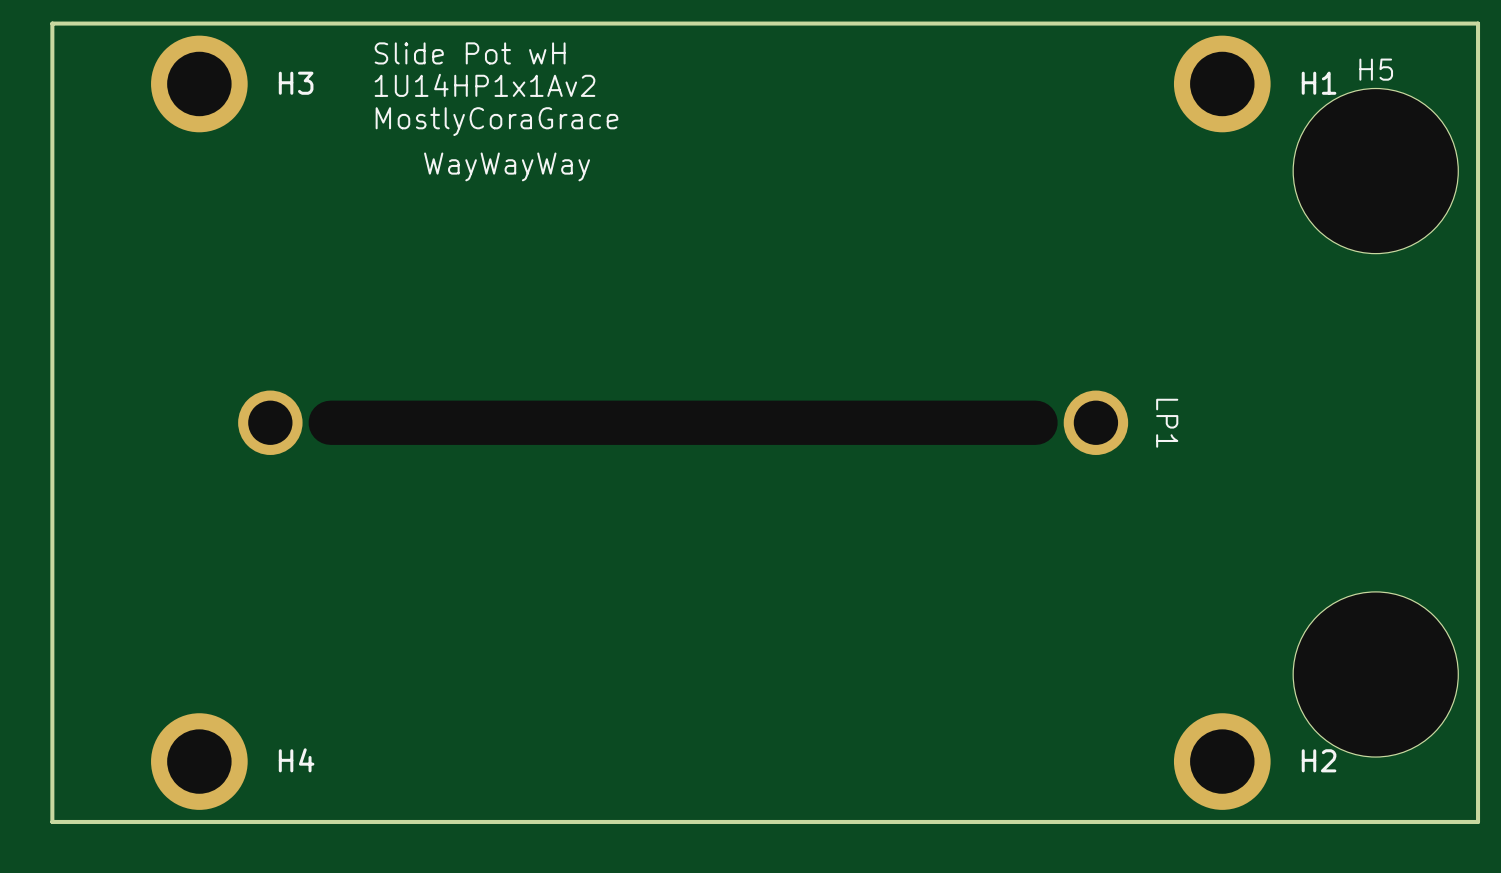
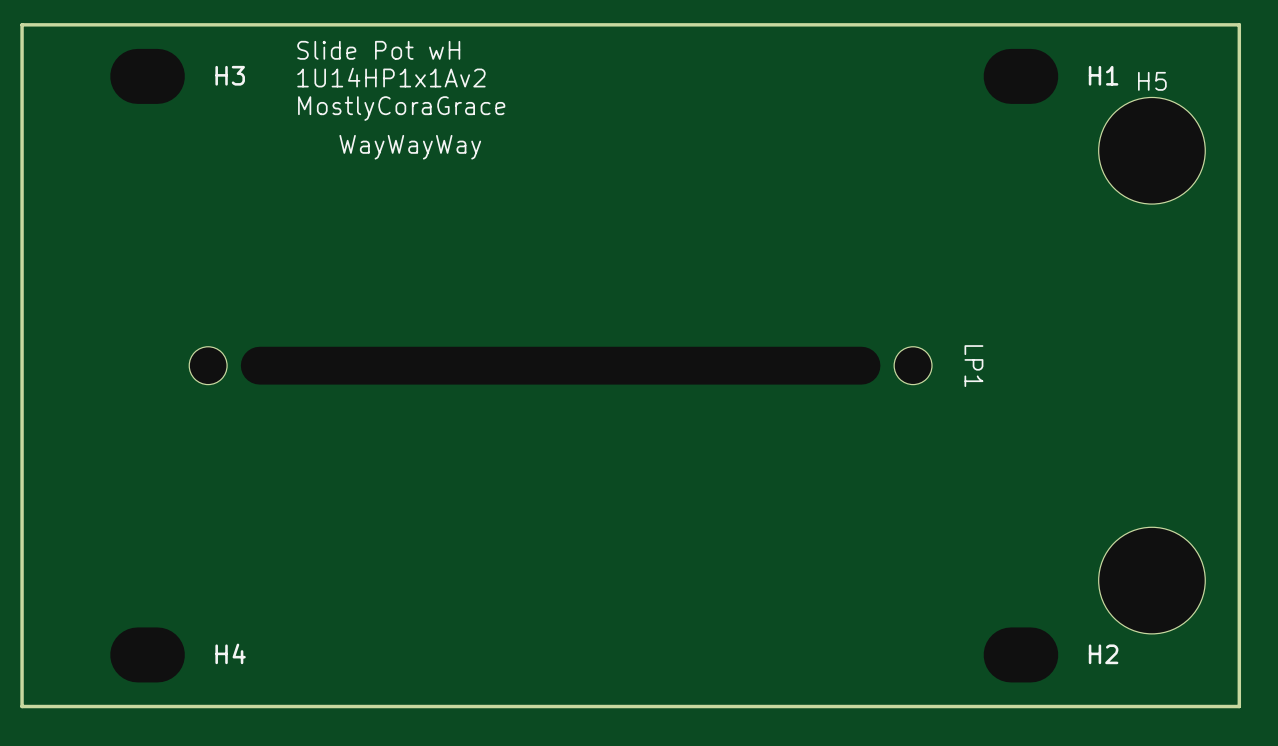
H3 footprint: [151, 35, 248, 133] -> [110, 48, 185, 104]
H1 footprint: [1173, 35, 1271, 133] -> [983, 48, 1059, 104]
H5 footprint: [1293, 88, 1459, 758] -> [1098, 97, 1206, 634]
LP1 footprint: [238, 390, 1129, 455] -> [189, 346, 932, 385]
H4 footprint: [151, 713, 248, 810] -> [110, 627, 185, 683]
H2 footprint: [1173, 713, 1271, 810] -> [983, 627, 1059, 683]

